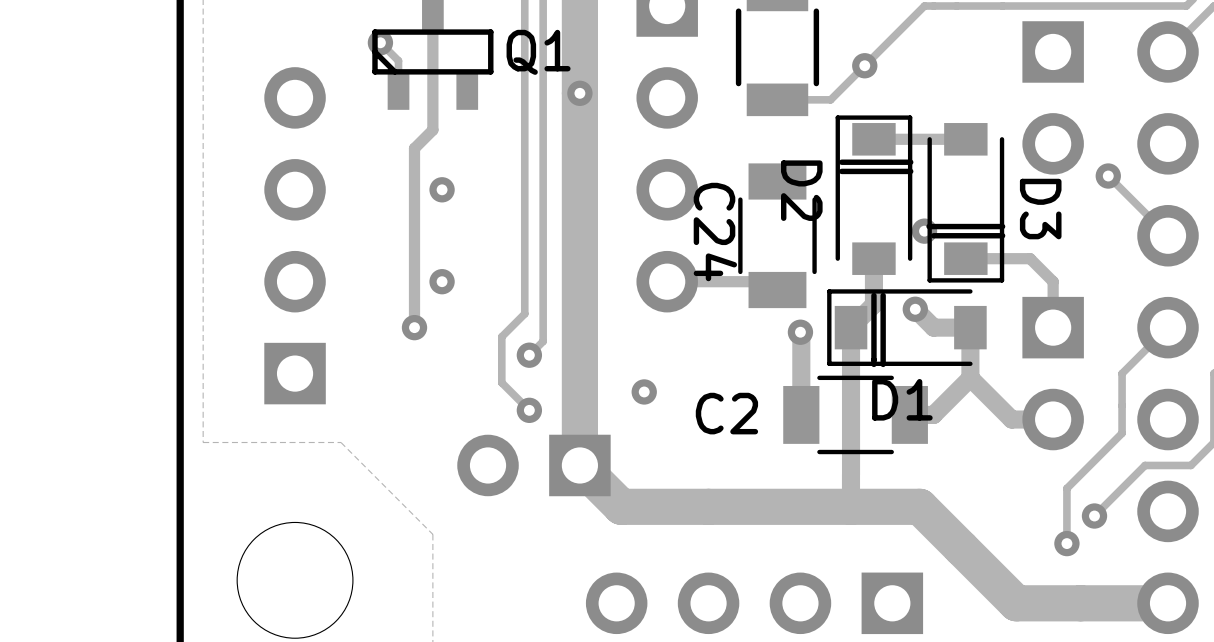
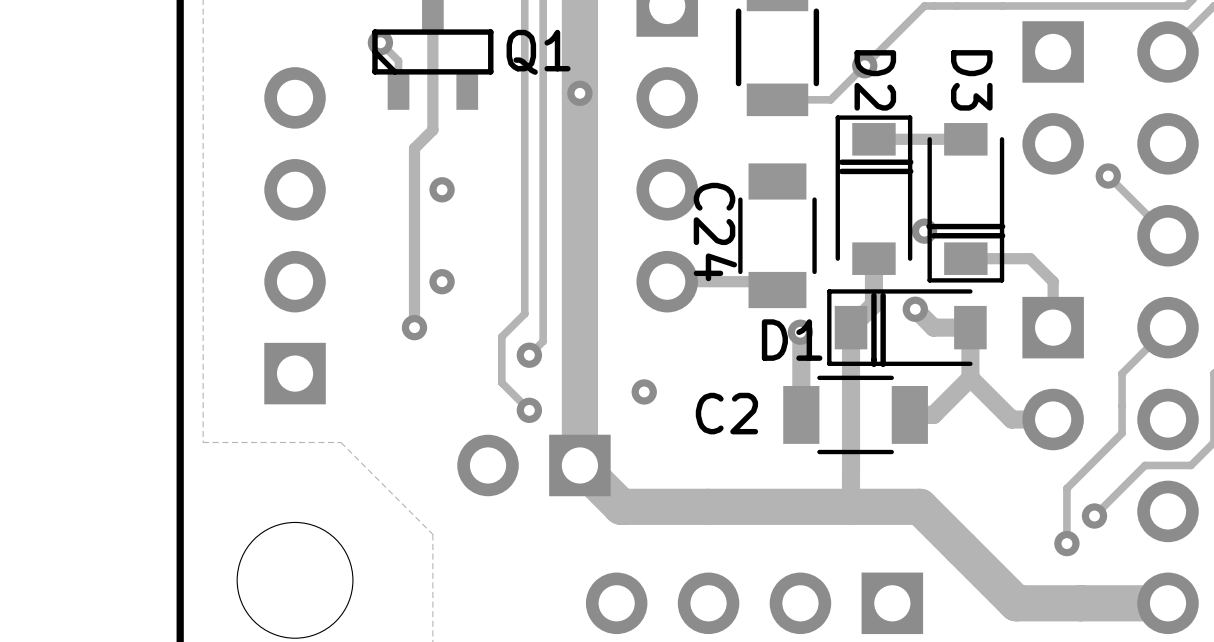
D2 name position: D2 (801, 190) -> D2 (875, 80)
D3 name position: D3 (1040, 209) -> D3 (971, 80)
D1 name position: D1 (902, 399) -> D1 (792, 340)

